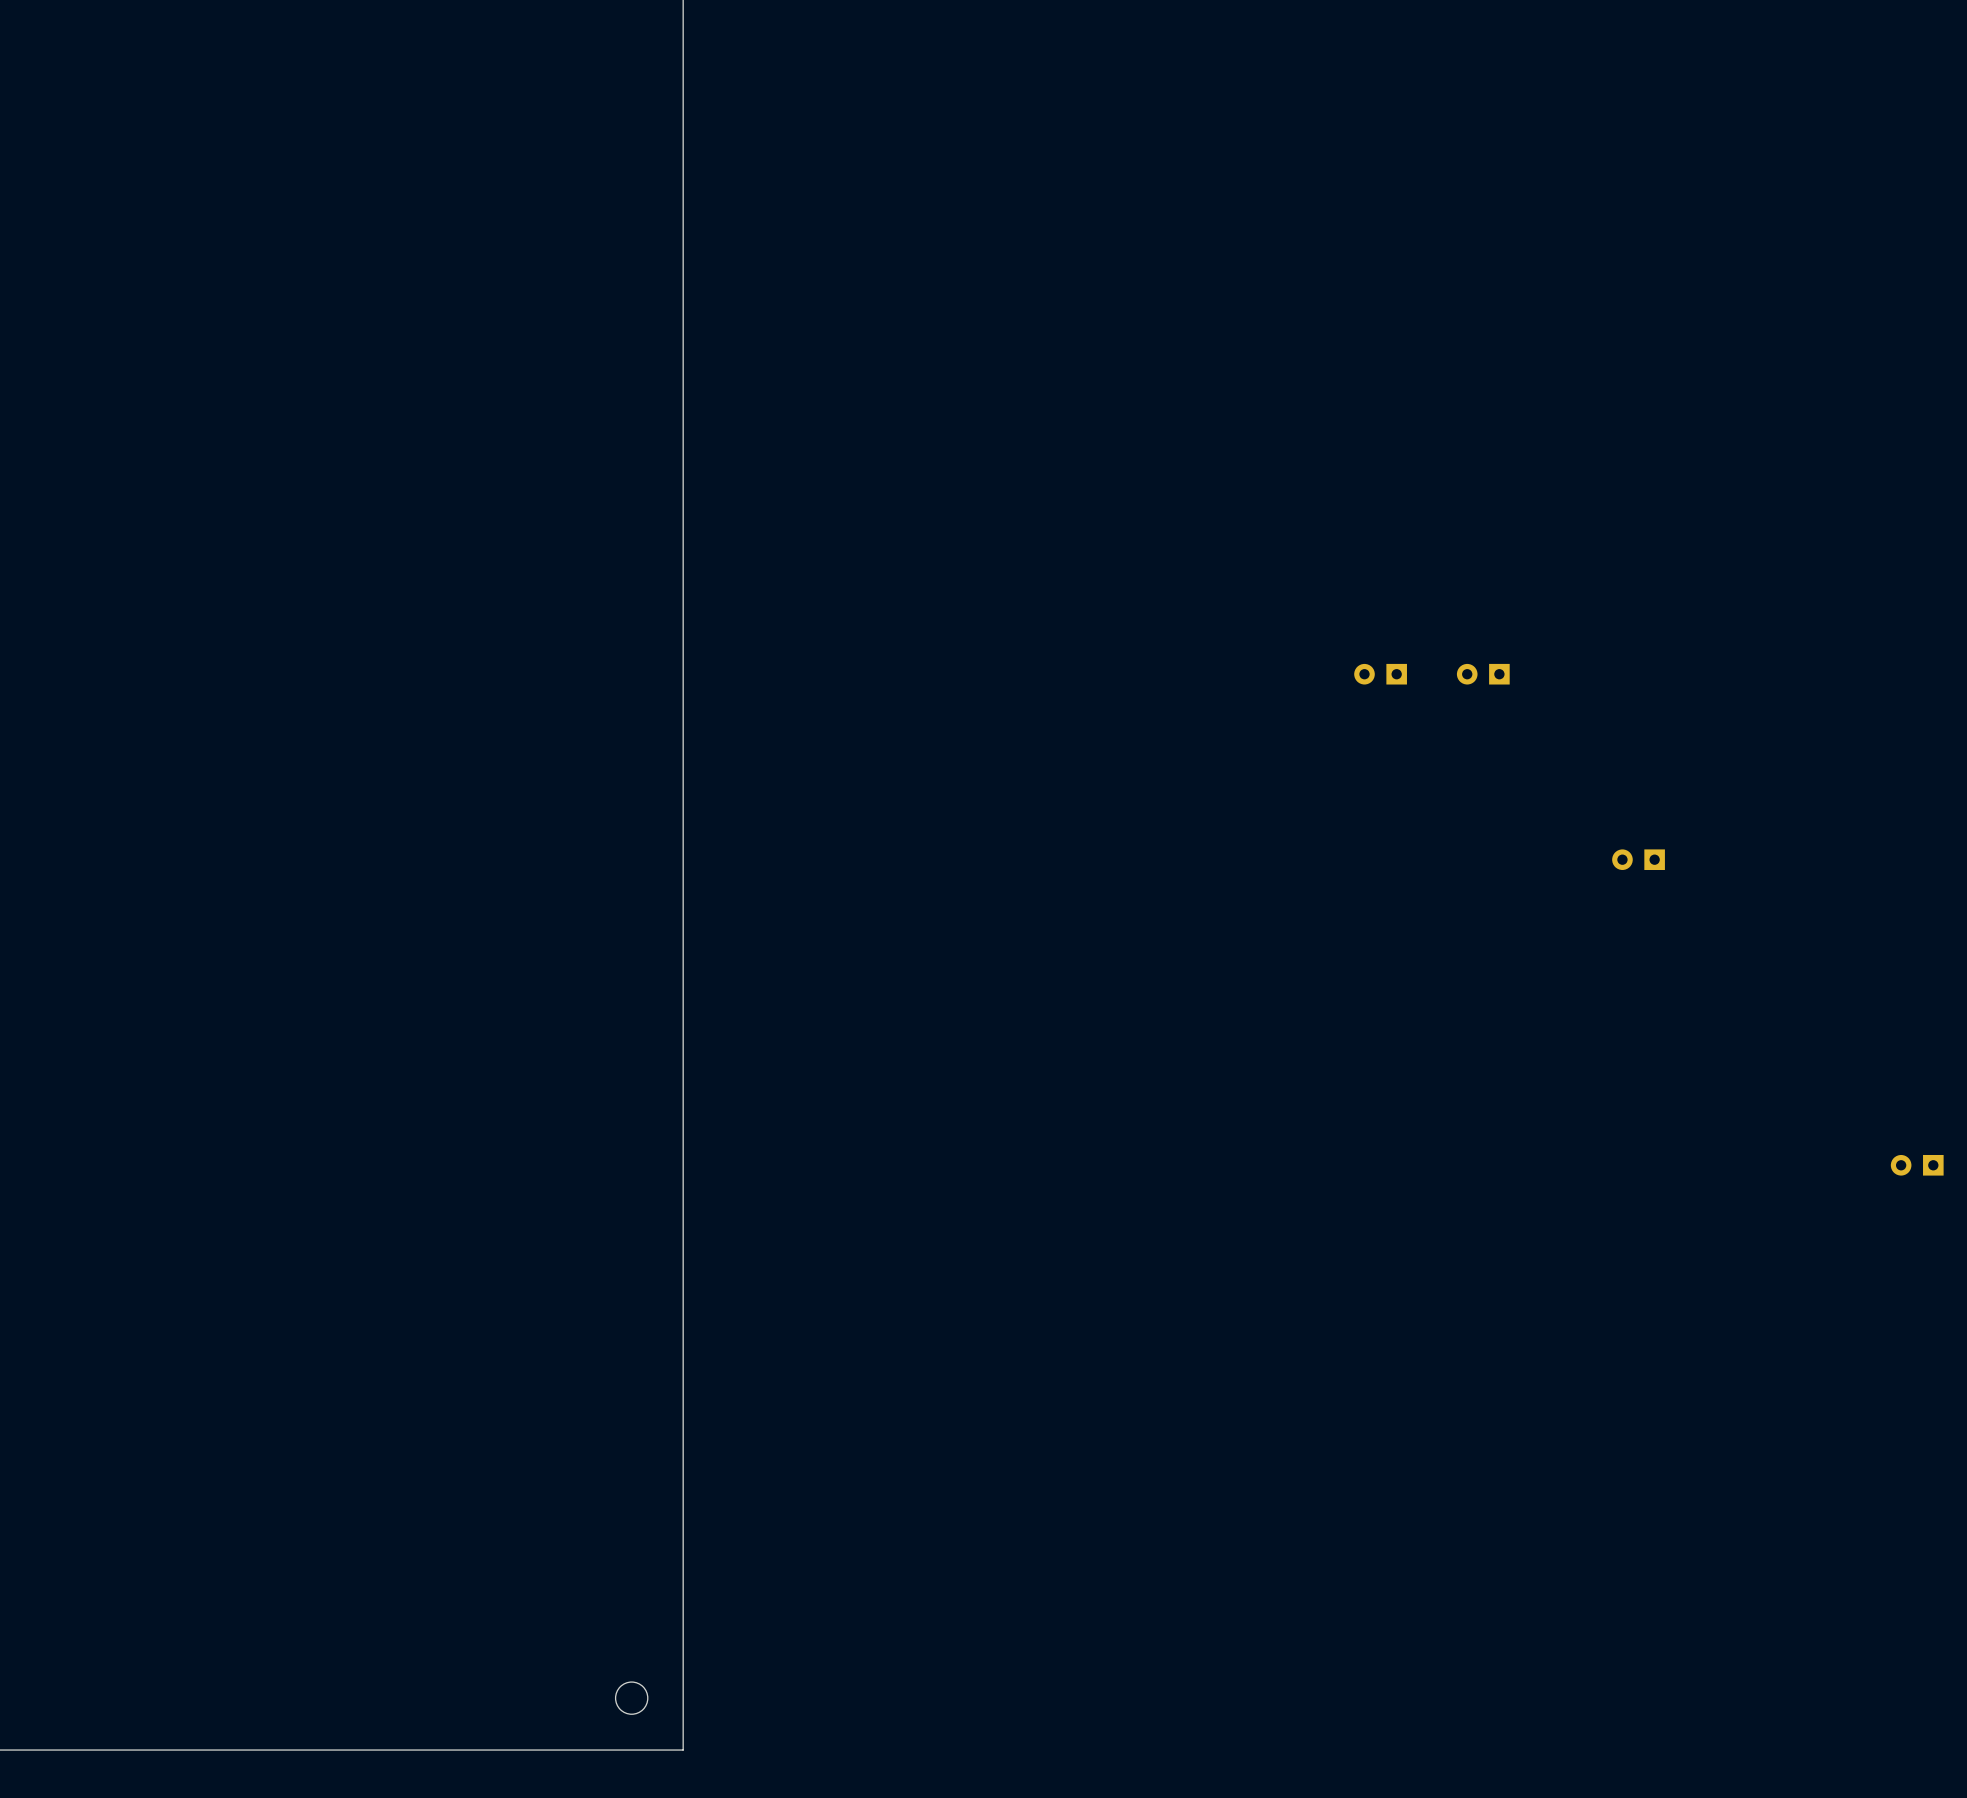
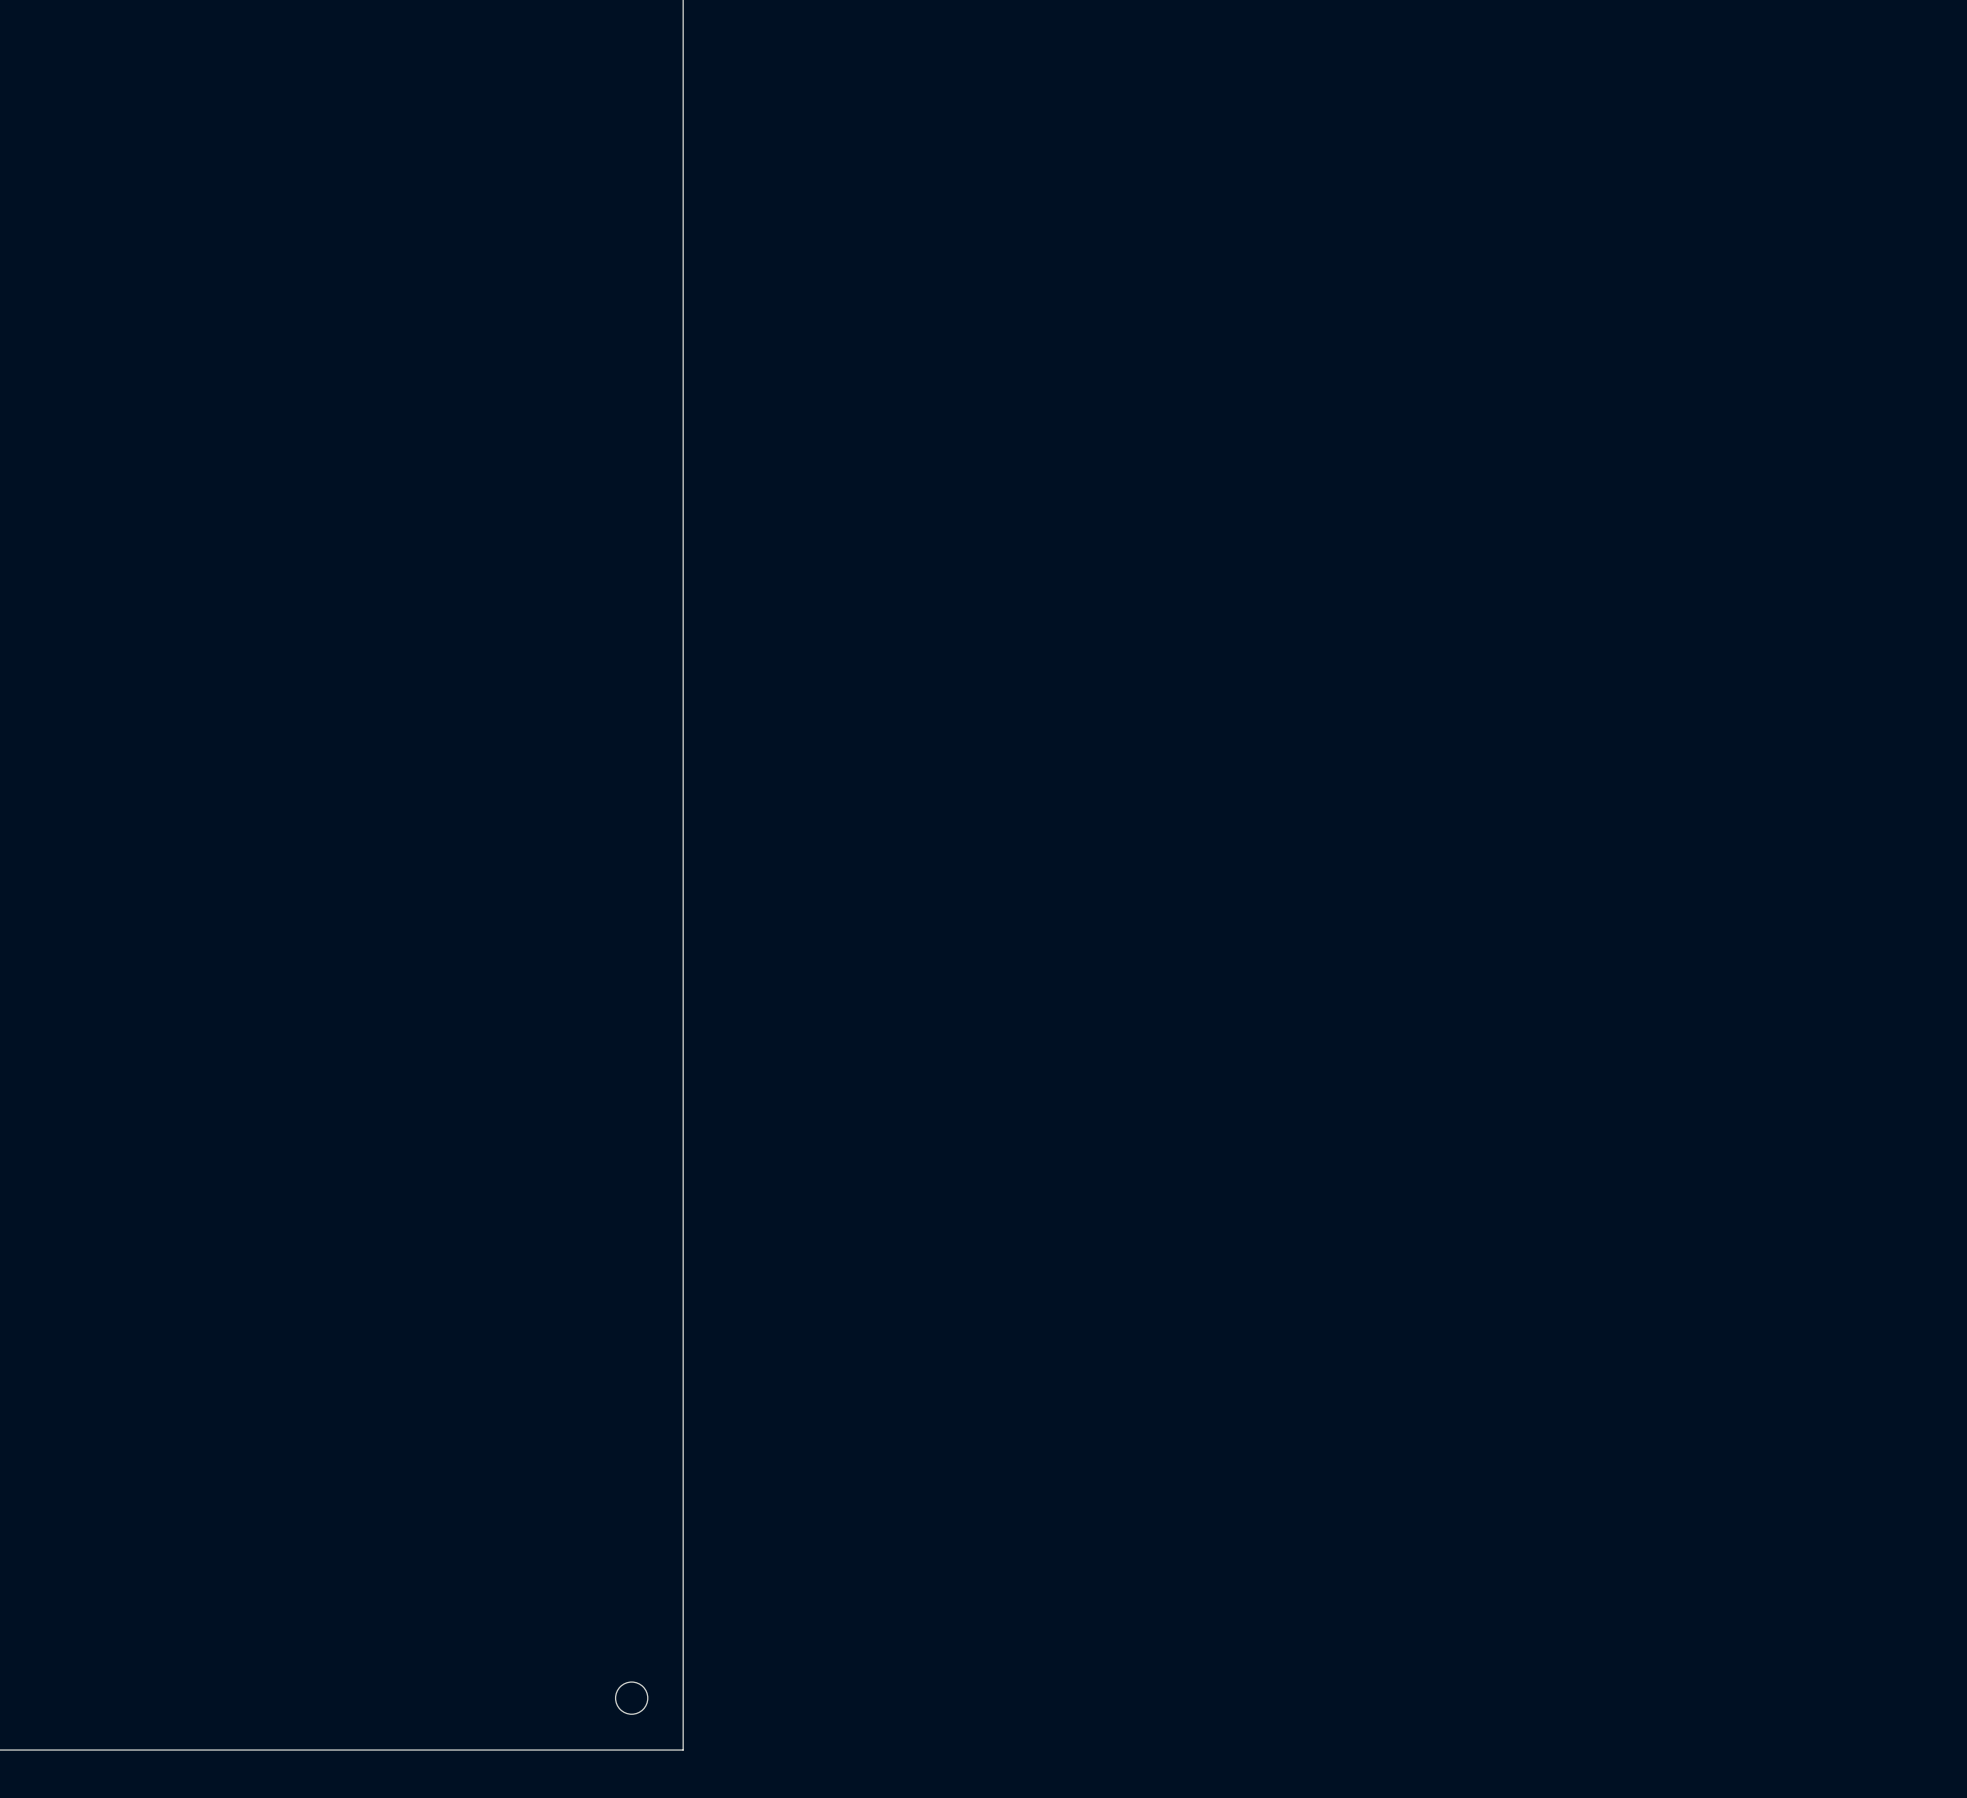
part: (1380, 674) -> none
part: (1483, 674) -> none
part: (1638, 859) -> none
part: (1917, 1165) -> none

